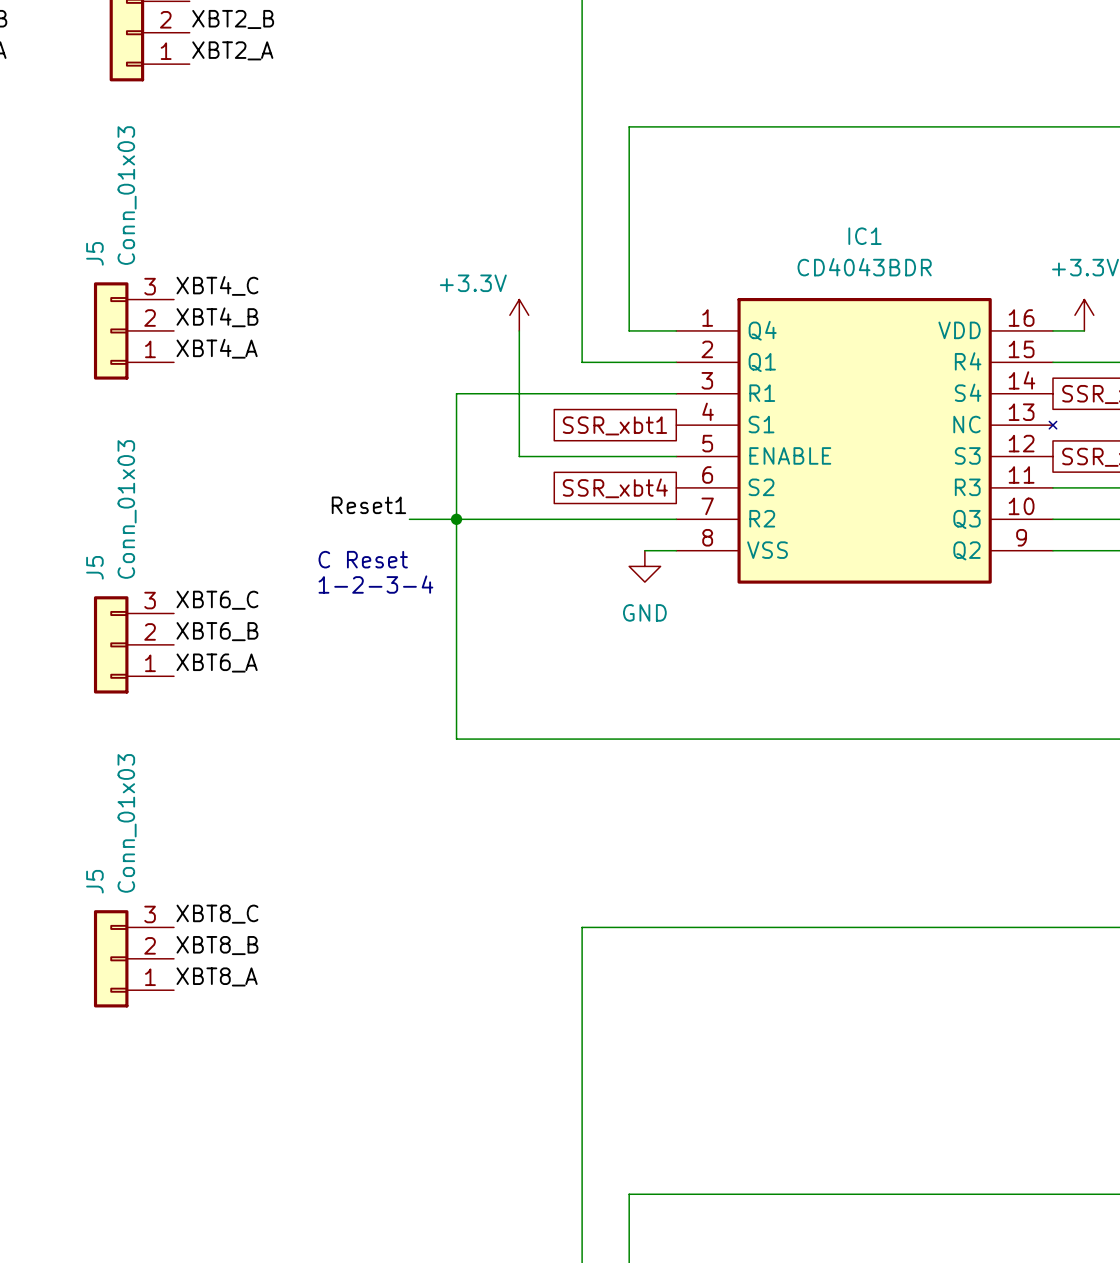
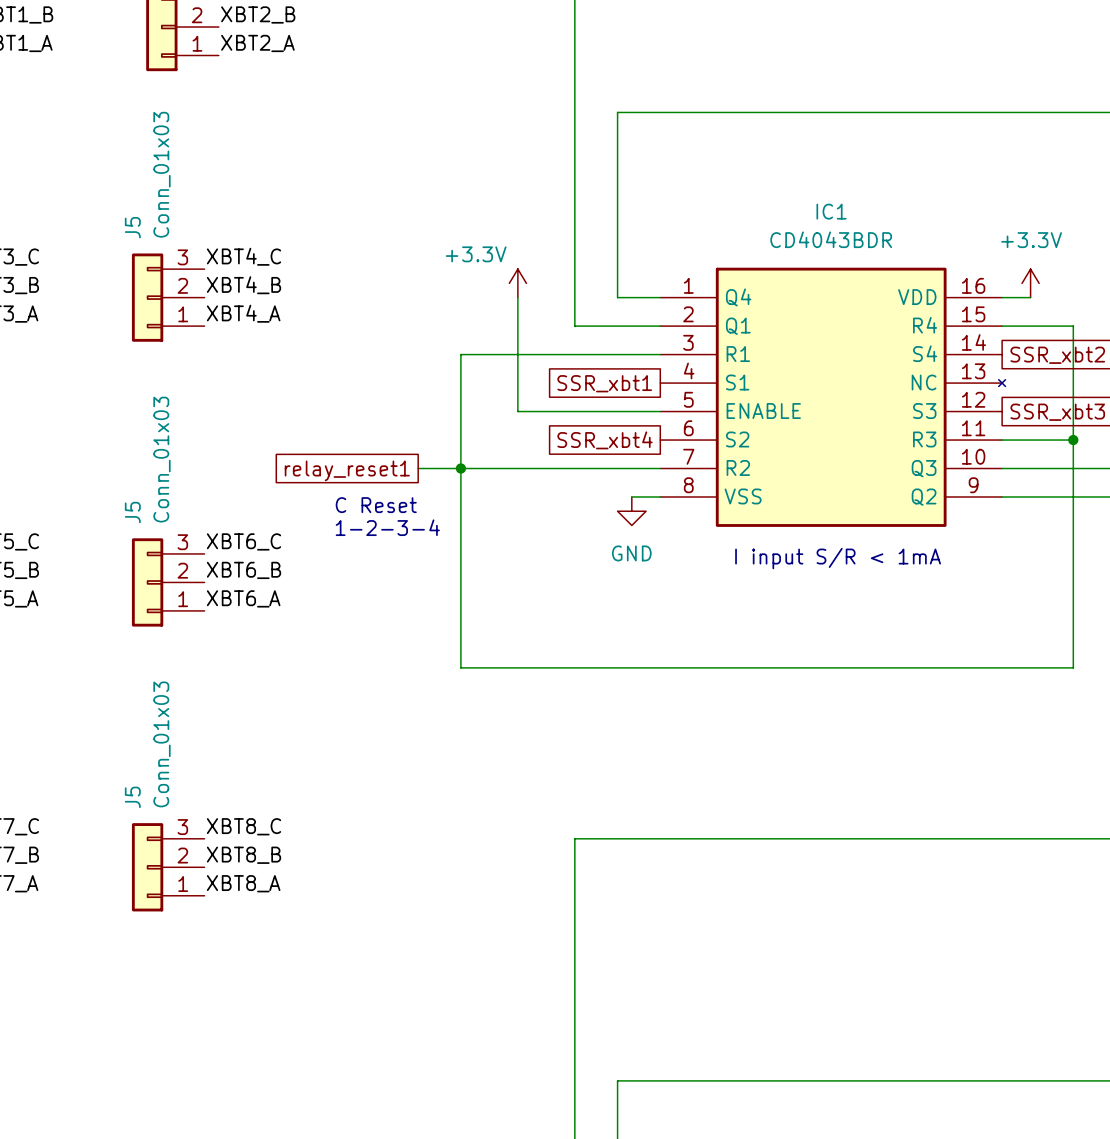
label: Reset1 (368, 505) -> none
global label: none -> relay_reset1 (347, 470)
text: none -> I input S/R < 1mA (838, 558)

